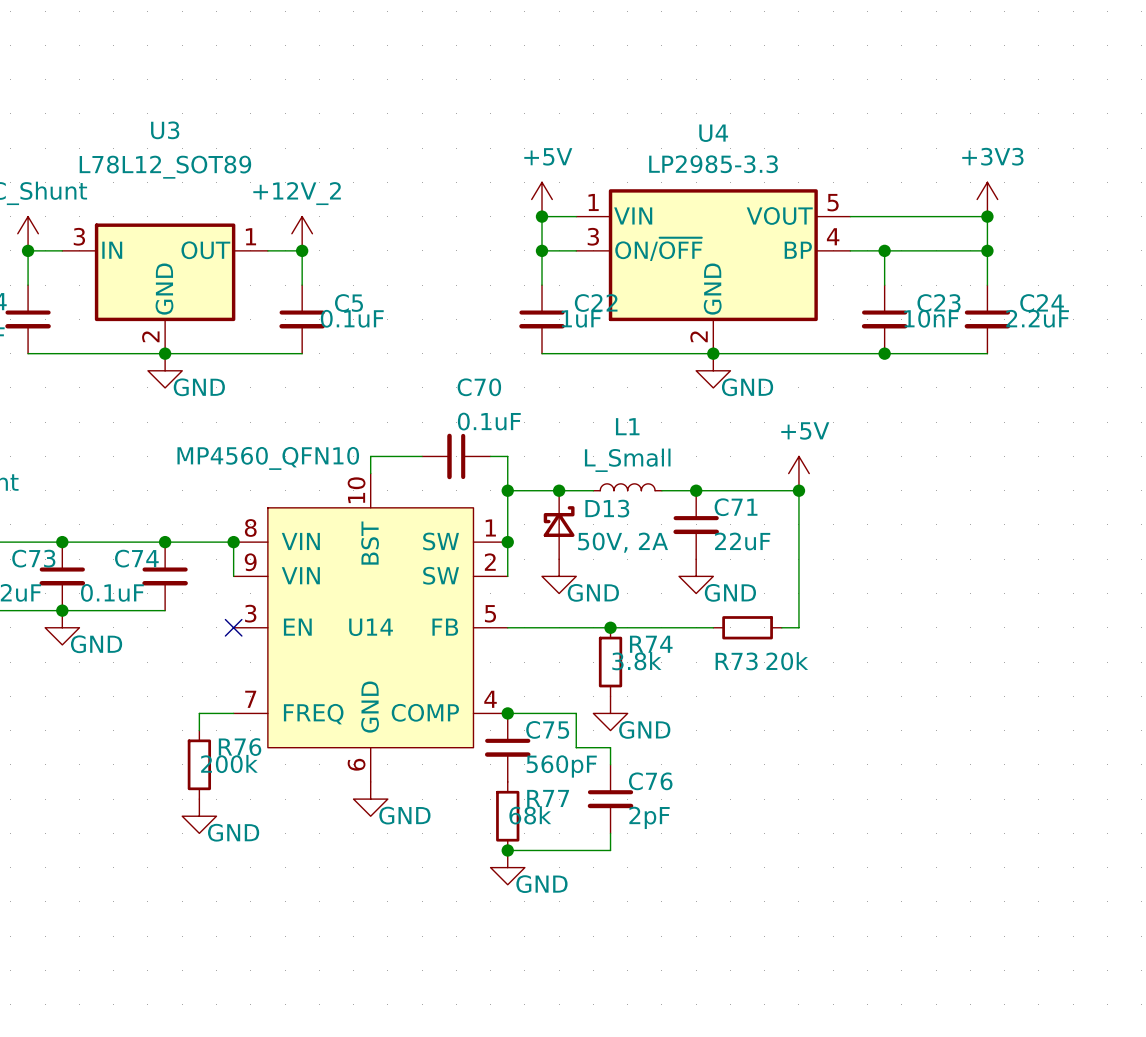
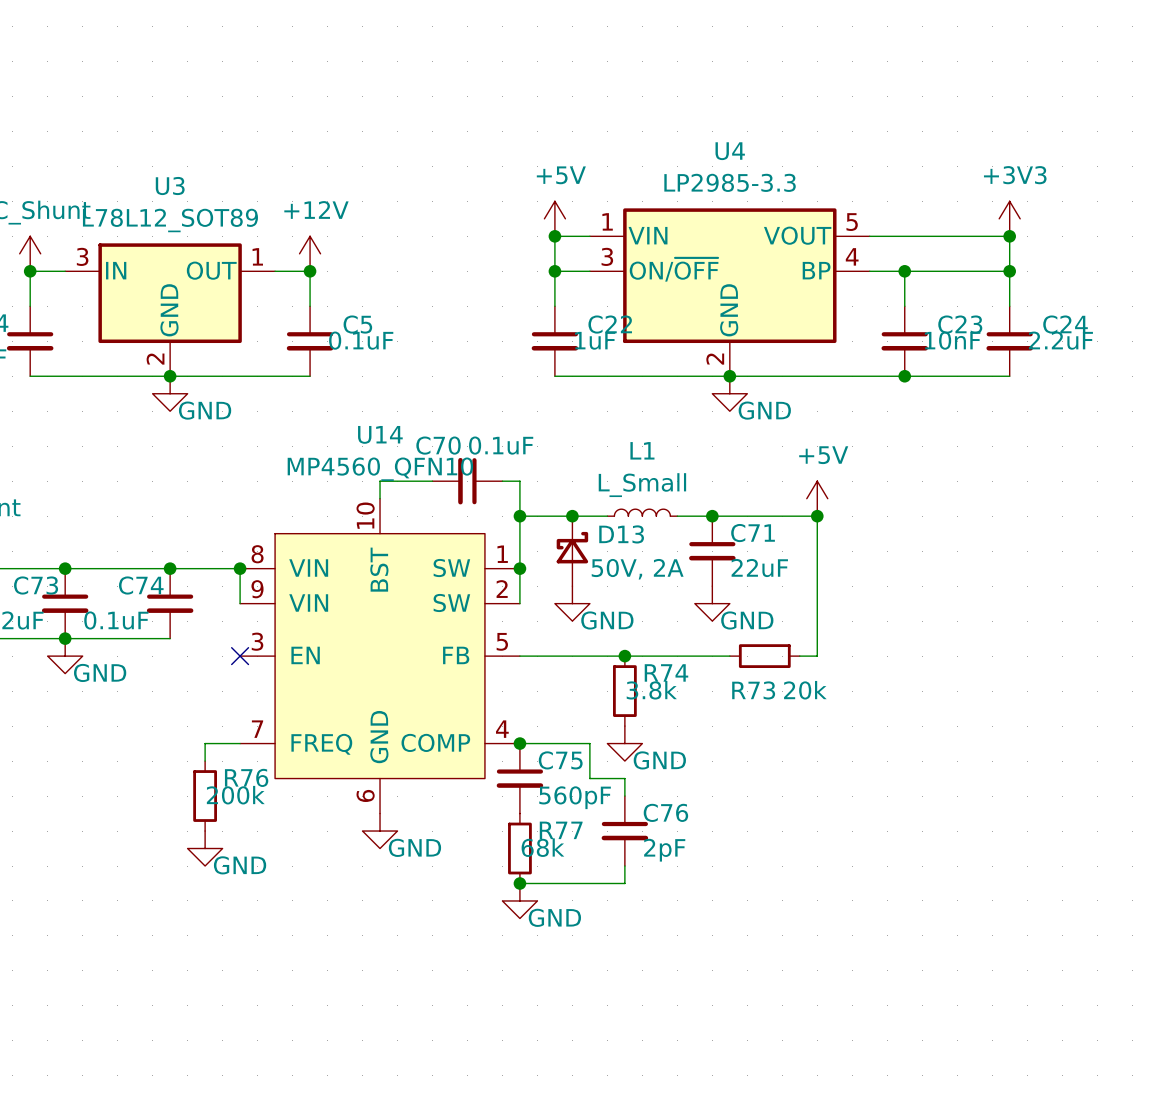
U3 name position: U3 (165, 130) -> U3 (170, 186)
U3 value position: L78L12_SOT89 (165, 167) -> L78L12_SOT89 (170, 220)
power symbol: +12V_2 (302, 233) -> +12V (310, 253)
C70 name position: C70 (479, 387) -> C70 (438, 445)
U14 value position: MP4560_QFN10 (268, 458) -> MP4560_QFN10 (380, 469)
U14 name position: U14 (371, 627) -> U14 (380, 434)

